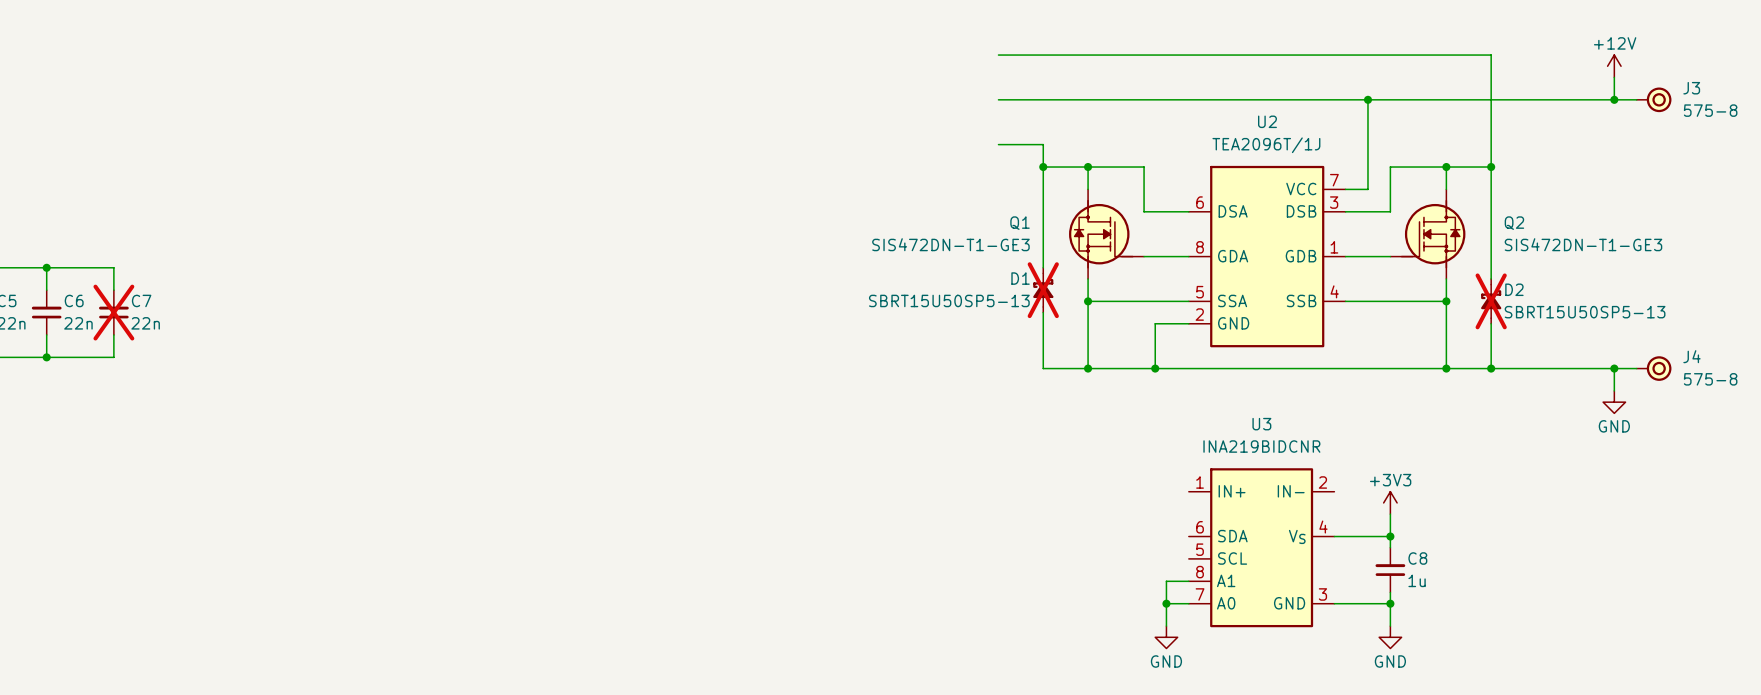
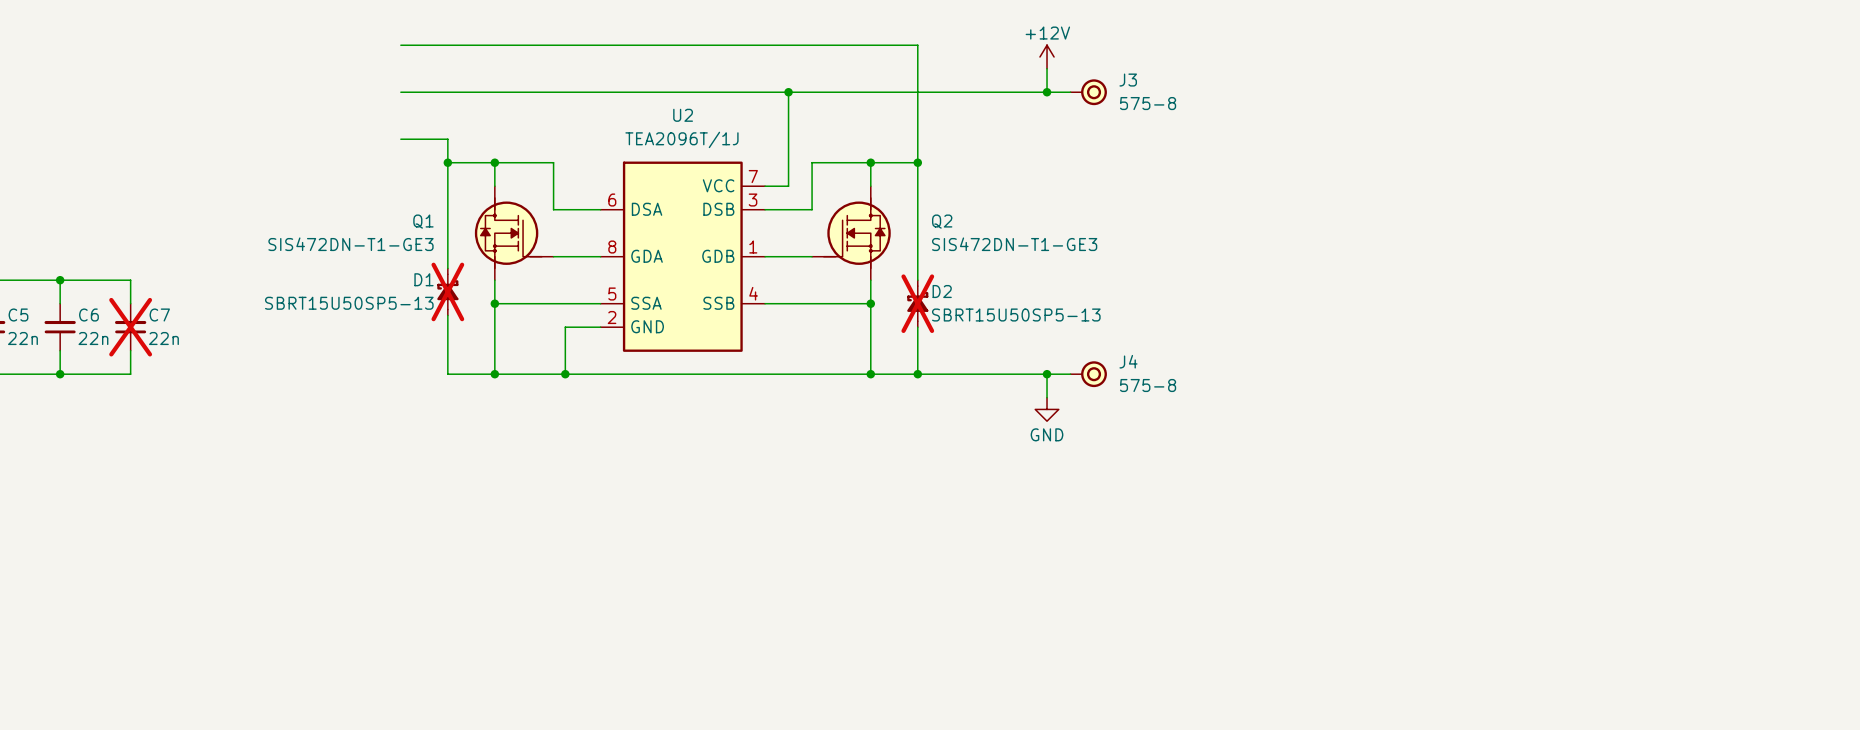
wire: none -> (400, 45) (917, 45) (917, 280)
power symbol: none -> +12V (1047, 56)
wire: (998, 55) (1491, 55) (1491, 278) -> none
power symbol: +12V (1614, 66) -> none
wire: (1614, 77) (1614, 99) -> none
wire: none -> (400, 92) (1070, 92)
wire: none -> (788, 92) (788, 186) (765, 186)
junction: none -> (788, 92)
junction: none -> (1047, 92)
wire: (998, 99) (1636, 99) -> none
wire: (1367, 99) (1367, 189) (1345, 189) -> none
junction: (1367, 99) -> none
junction: (1614, 99) -> none
J3 position: (1654, 99) -> (1088, 92)
wire: none -> (400, 139) (447, 139) (447, 268)
wire: (998, 144) (1043, 144) (1043, 267) -> none
wire: none -> (447, 162) (553, 162) (553, 209) (600, 209)
junction: none -> (447, 162)
wire: none -> (494, 162) (494, 186)
junction: none -> (494, 162)
wire: none -> (870, 162) (870, 186)
junction: none -> (870, 162)
wire: none -> (917, 162) (812, 162) (812, 209) (765, 209)
junction: none -> (917, 162)
wire: (1043, 167) (1144, 167) (1144, 211) (1188, 211) -> none
junction: (1043, 167) -> none
wire: (1088, 167) (1088, 189) -> (1047, 68) (1047, 92)
junction: (1088, 167) -> none
wire: (1446, 167) (1446, 189) -> none
junction: (1446, 167) -> none
wire: (1491, 167) (1390, 167) (1390, 211) (1345, 211) -> none
junction: (1491, 167) -> none
Q1 position: (1106, 234) -> (514, 233)
Q2 position: (1427, 234) -> (851, 233)
wire: none -> (553, 256) (600, 256)
wire: none -> (765, 256) (812, 256)
wire: (1144, 256) (1188, 256) -> none
U2 position: (1267, 256) -> (682, 256)
wire: (1345, 256) (1390, 256) -> none
wire: none -> (494, 280) (494, 374)
wire: none -> (870, 280) (870, 374)
wire: (1088, 278) (1088, 368) -> none
wire: (1446, 278) (1446, 368) -> none
wire: none -> (494, 303) (600, 303)
junction: none -> (494, 303)
wire: none -> (765, 303) (870, 303)
junction: none -> (870, 303)
D1 position: (1043, 290) -> (447, 291)
wire: none -> (447, 315) (447, 374) (1070, 374)
wire: (1088, 301) (1188, 301) -> none
junction: (1088, 301) -> none
wire: (1345, 301) (1446, 301) -> none
junction: (1446, 301) -> none
D2 position: (1491, 301) -> (917, 303)
wire: none -> (600, 327) (565, 327) (565, 374)
wire: none -> (917, 327) (917, 374)
wire: (1043, 312) (1043, 368) (1636, 368) -> none
wire: (1188, 323) (1155, 323) (1155, 368) -> none
wire: (1491, 323) (1491, 368) -> none
junction: none -> (494, 374)
junction: none -> (565, 374)
junction: none -> (870, 374)
junction: none -> (917, 374)
wire: none -> (1047, 374) (1047, 397)
junction: none -> (1047, 374)
junction: (1088, 368) -> none
junction: (1155, 368) -> none
junction: (1446, 368) -> none
junction: (1491, 368) -> none
wire: (1614, 368) (1614, 390) -> none
junction: (1614, 368) -> none
J4 position: (1654, 368) -> (1088, 374)
power symbol: none -> GND (1047, 409)
power symbol: GND (1614, 402) -> none
power symbol: +3V3 (1390, 502) -> none
wire: (1390, 514) (1390, 547) -> none
wire: (1334, 536) (1390, 536) -> none
junction: (1390, 536) -> none
U3: (1261, 547) -> none
C8: (1390, 570) -> none
wire: (1188, 581) (1166, 581) (1166, 626) -> none
wire: (1390, 592) (1390, 626) -> none
wire: (1166, 603) (1188, 603) -> none
junction: (1166, 603) -> none
wire: (1334, 603) (1390, 603) -> none
junction: (1390, 603) -> none
power symbol: GND (1166, 637) -> none
power symbol: GND (1390, 637) -> none

